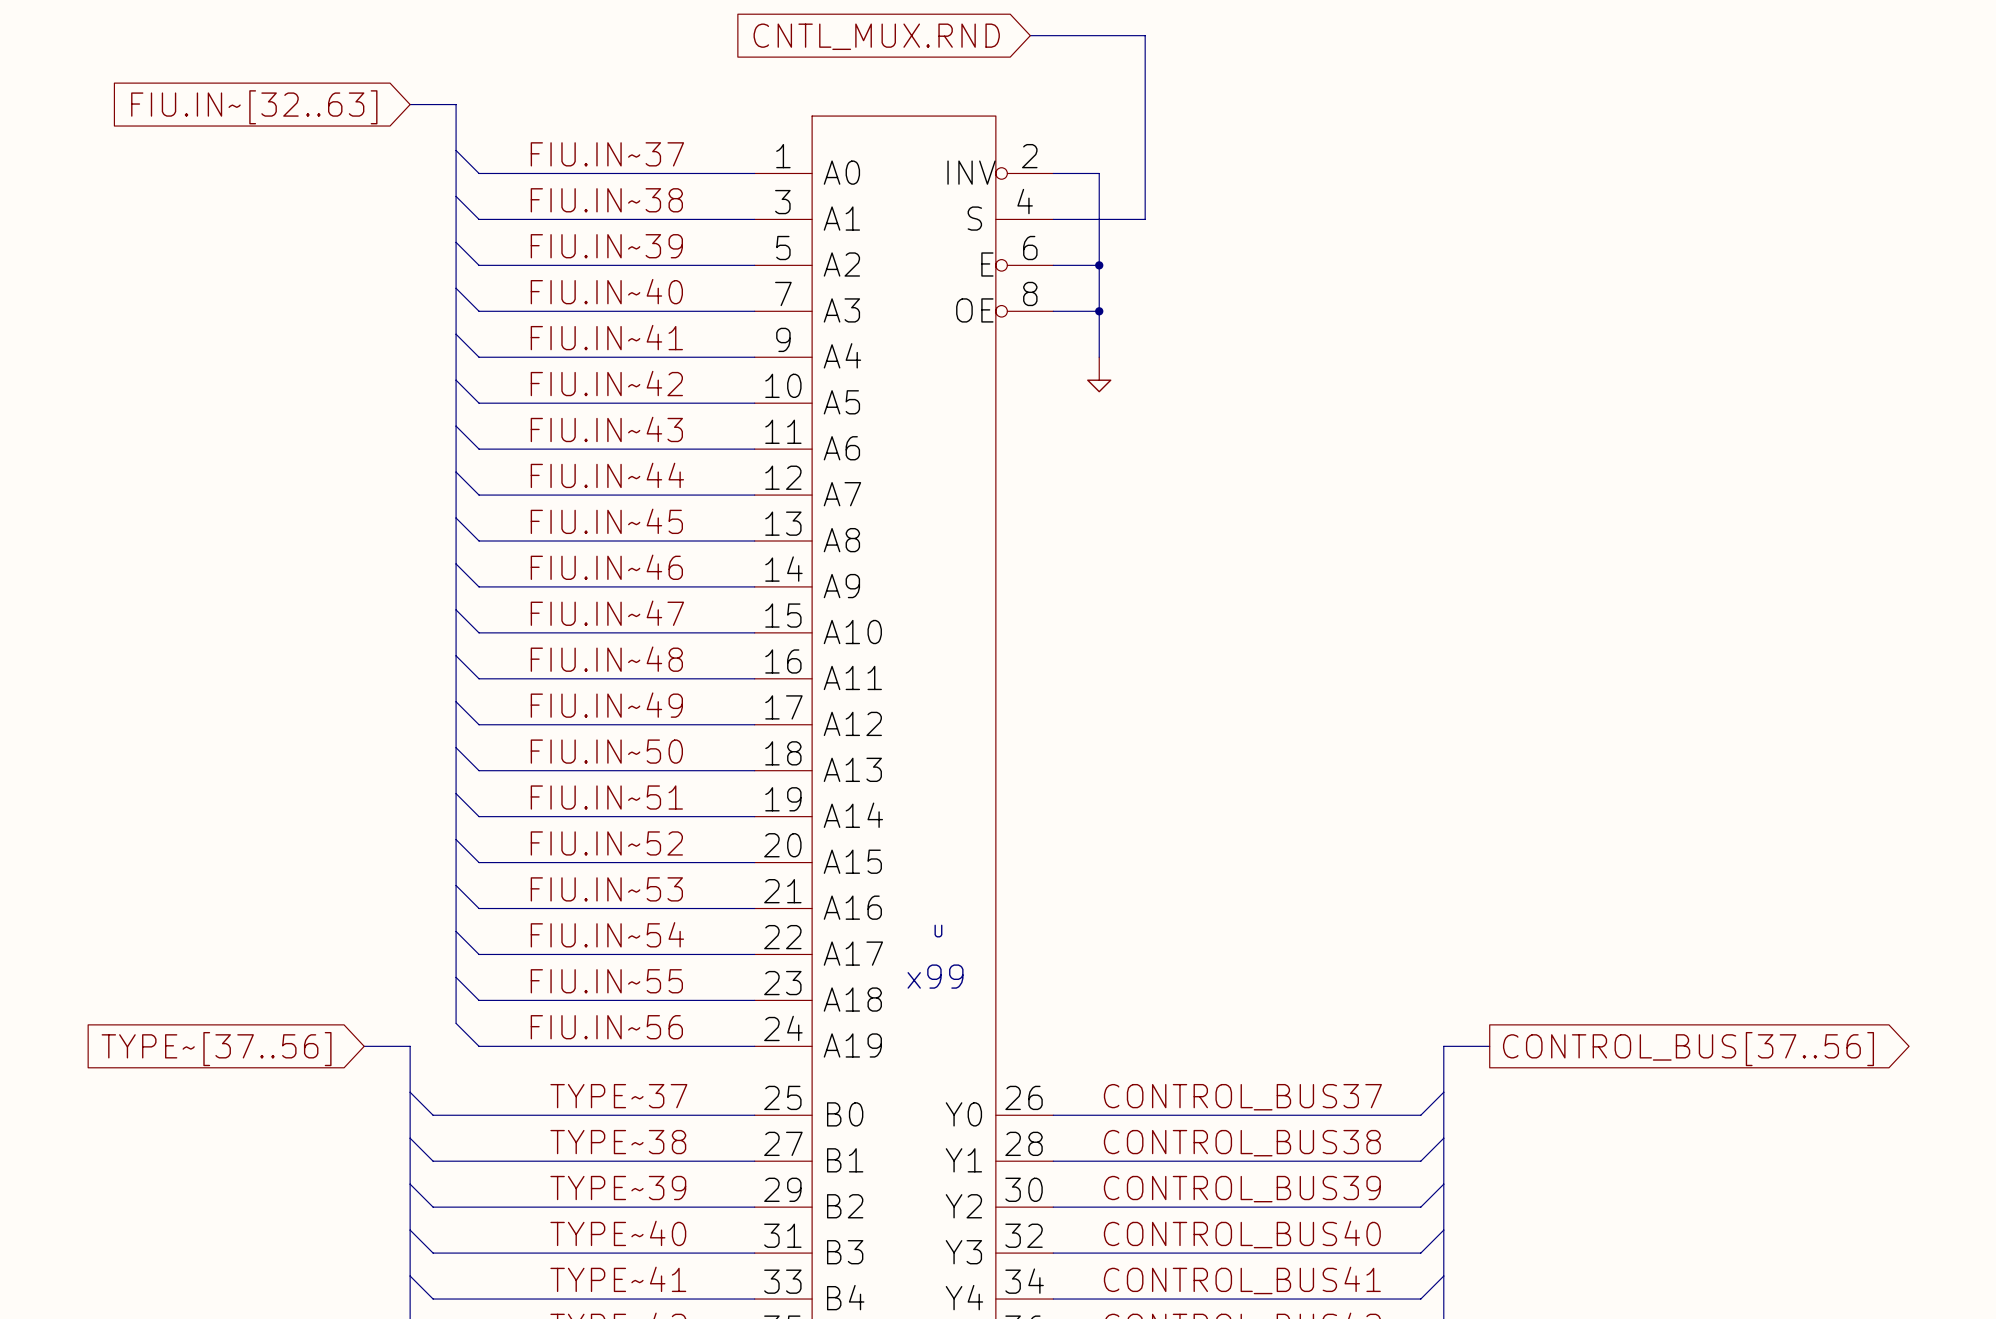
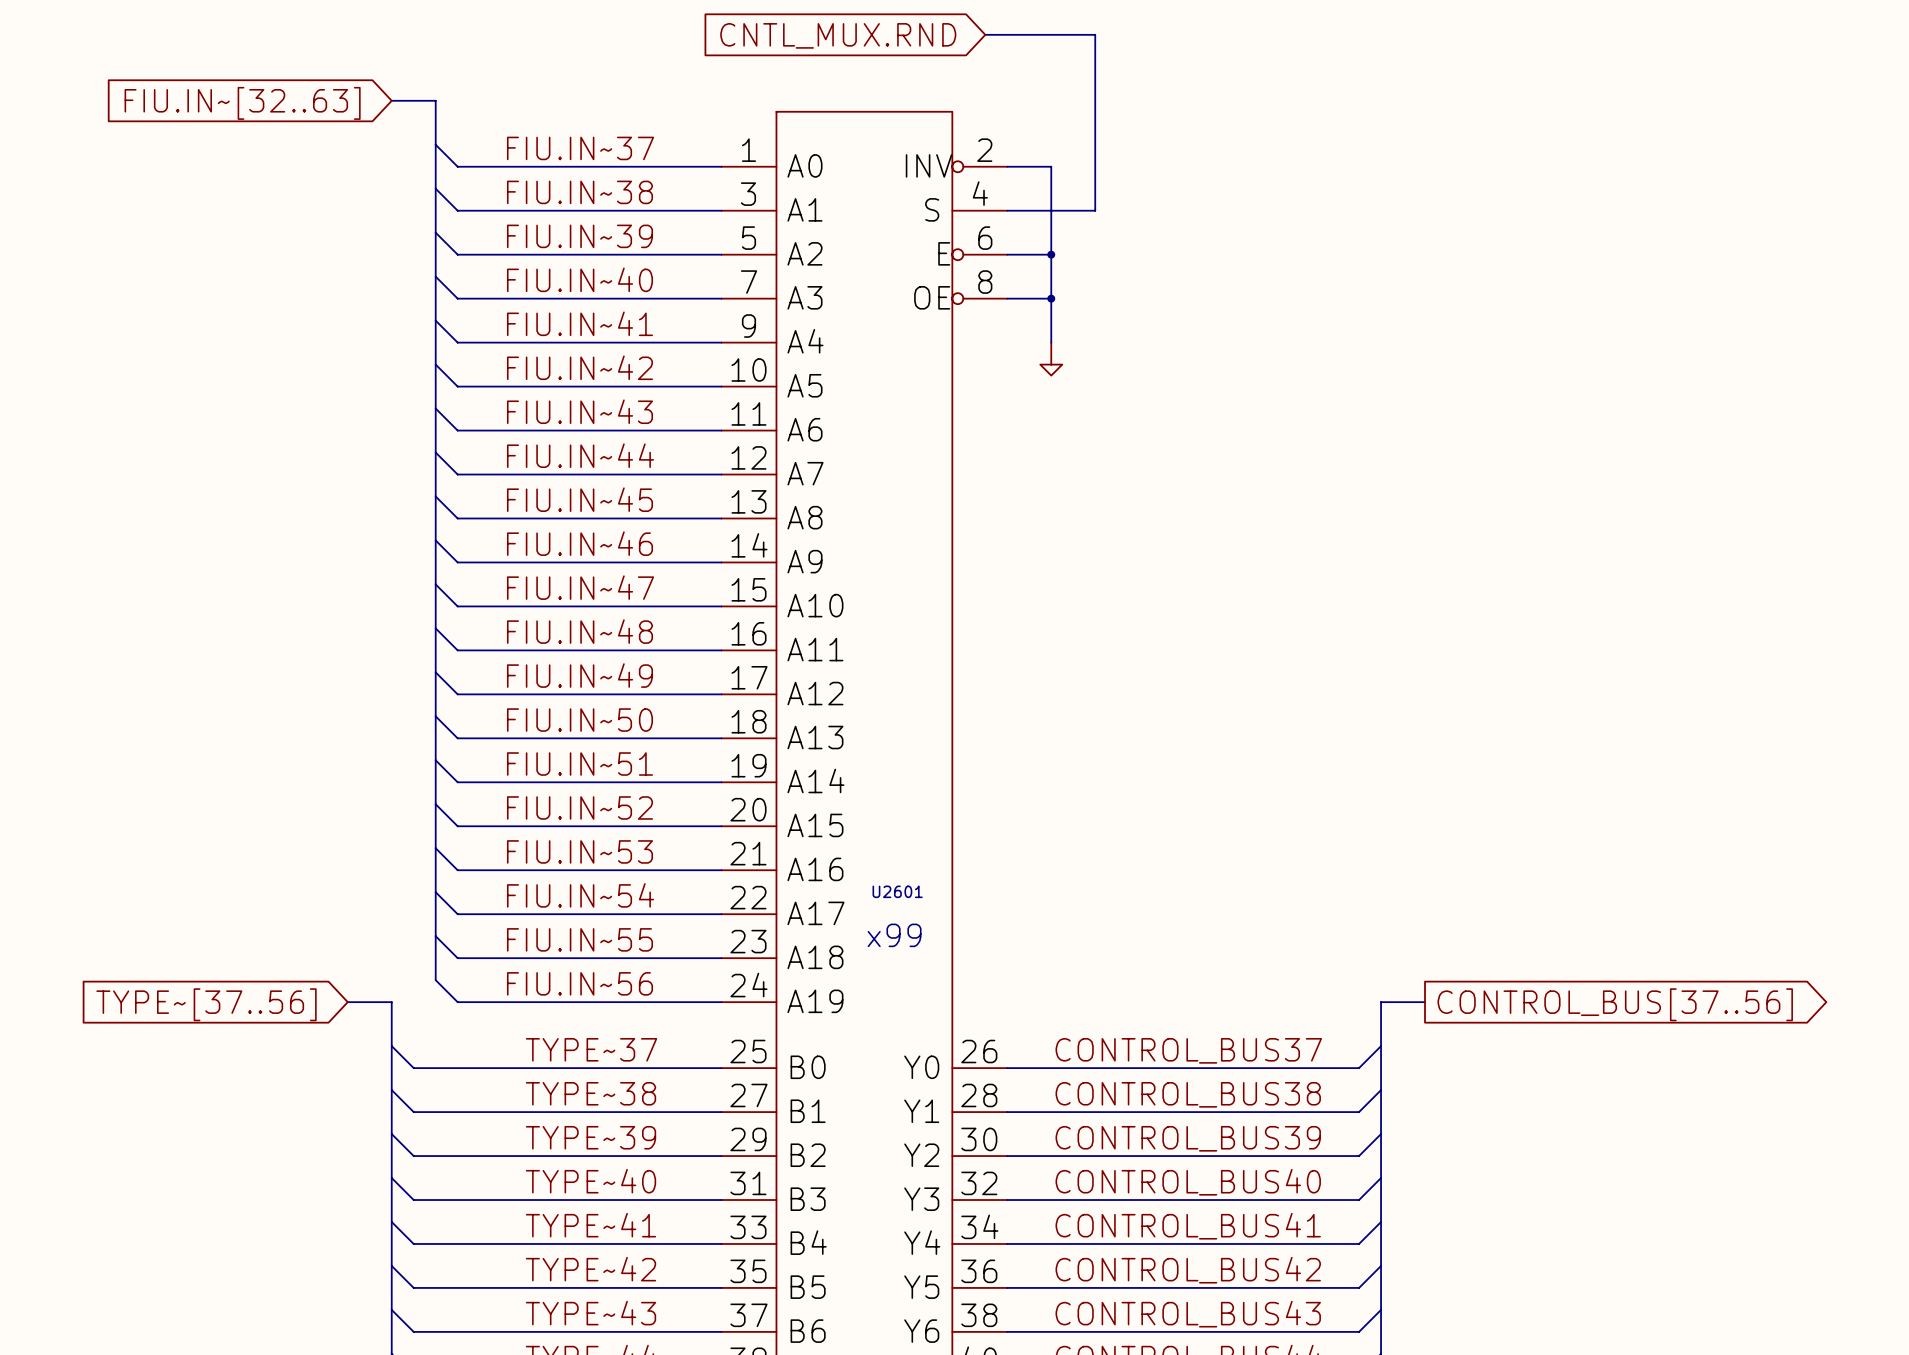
U name: U (938, 931) -> U2601 (897, 891)

